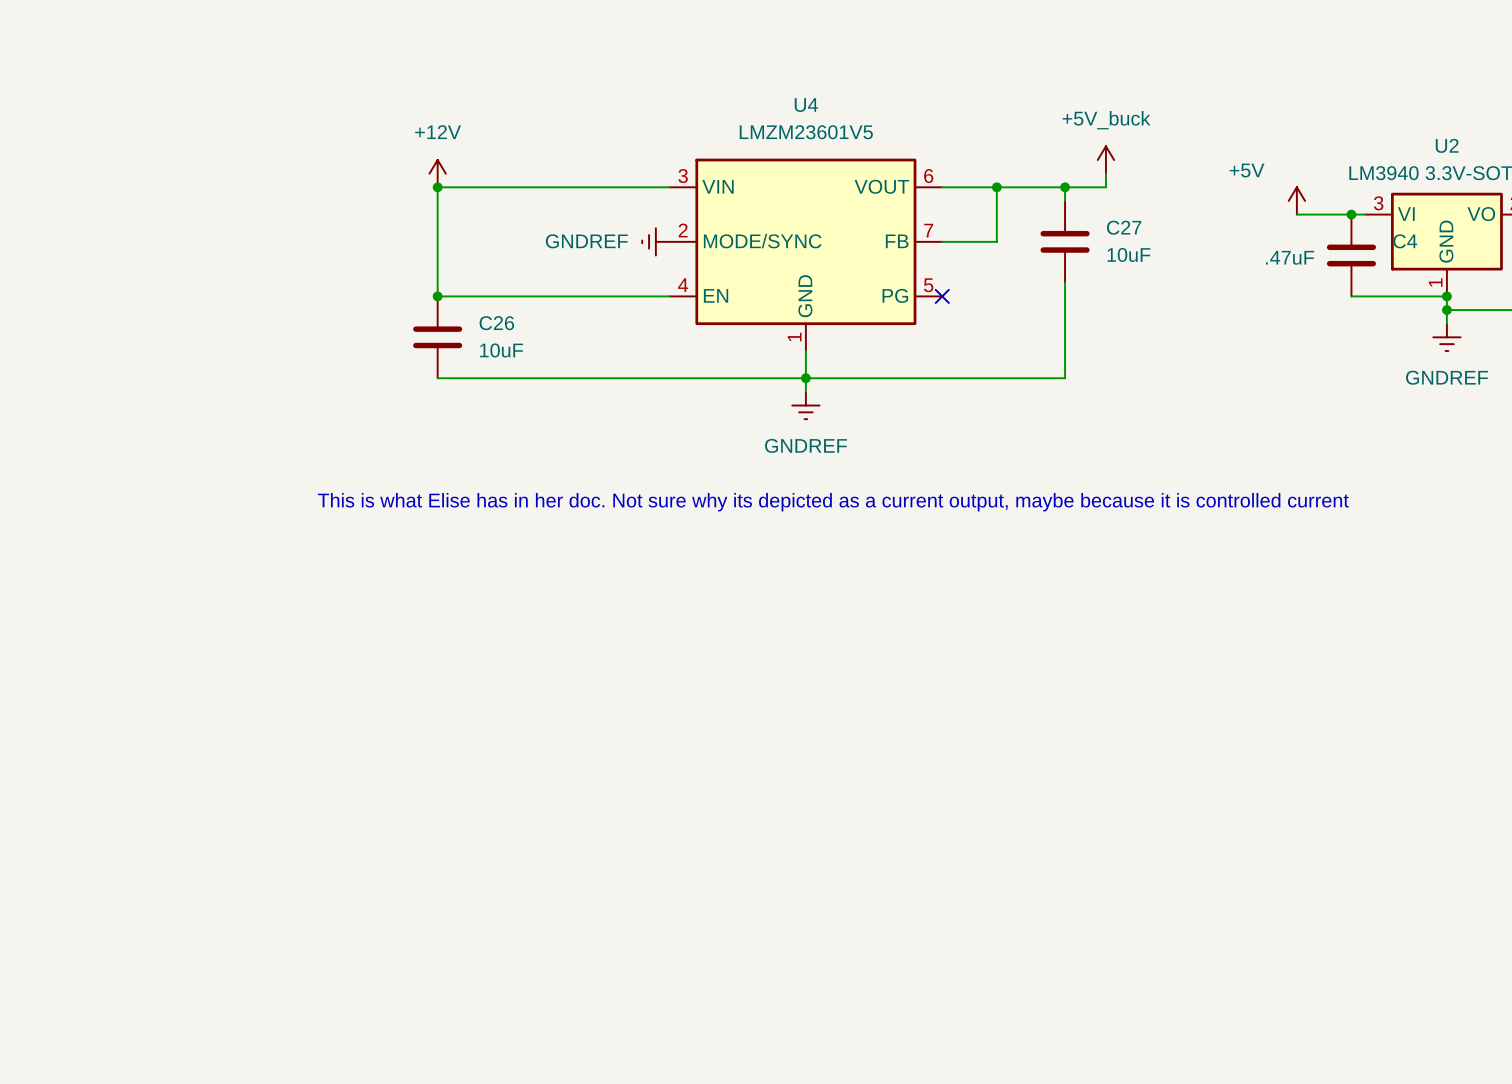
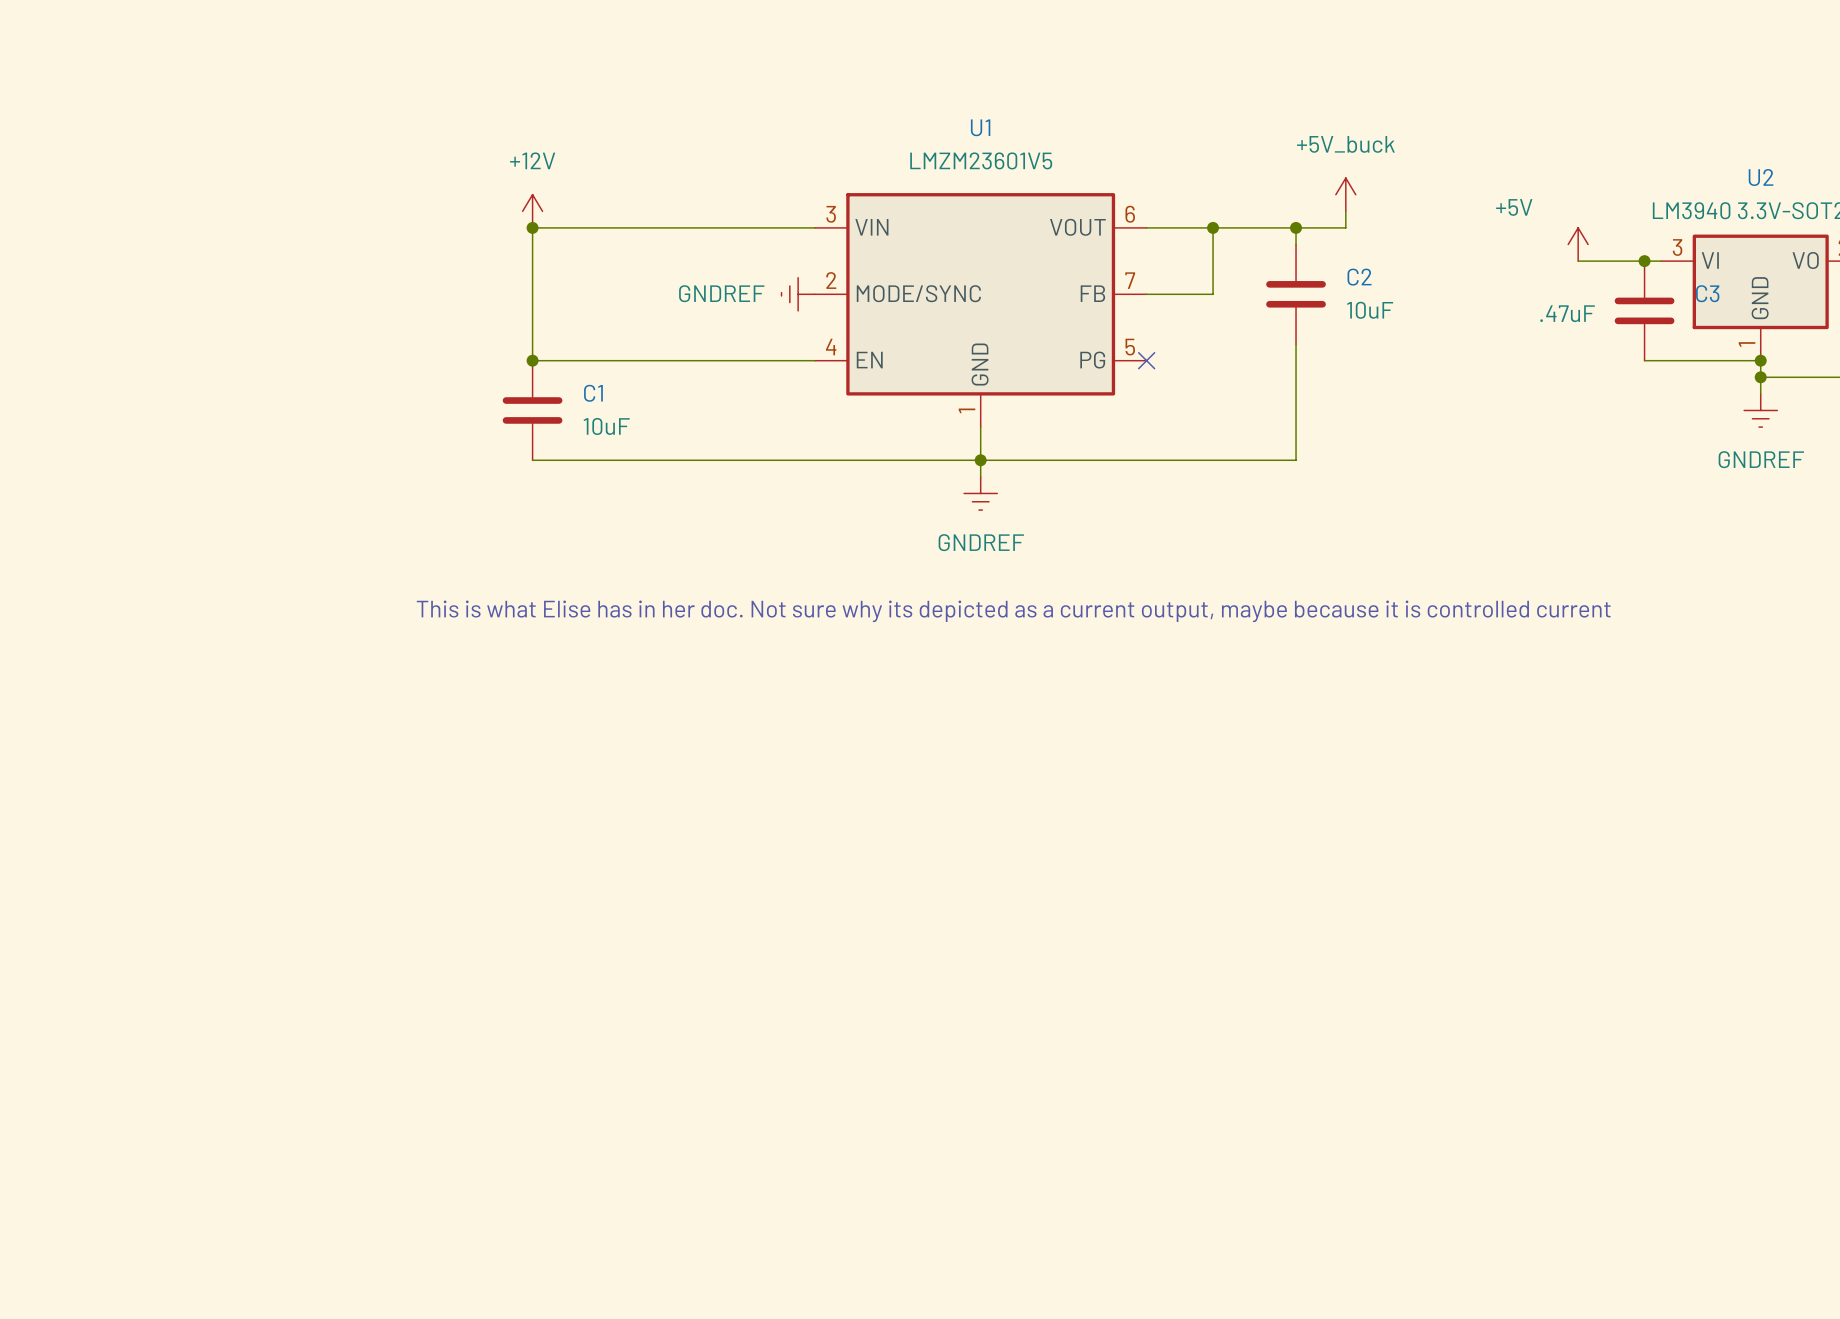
U4 name: U4 (806, 105) -> U1 (980, 127)
C27 name: C27 (1124, 227) -> C2 (1359, 277)
C4 name: C4 (1405, 241) -> C3 (1707, 293)
C26 name: C26 (496, 323) -> C1 (593, 393)

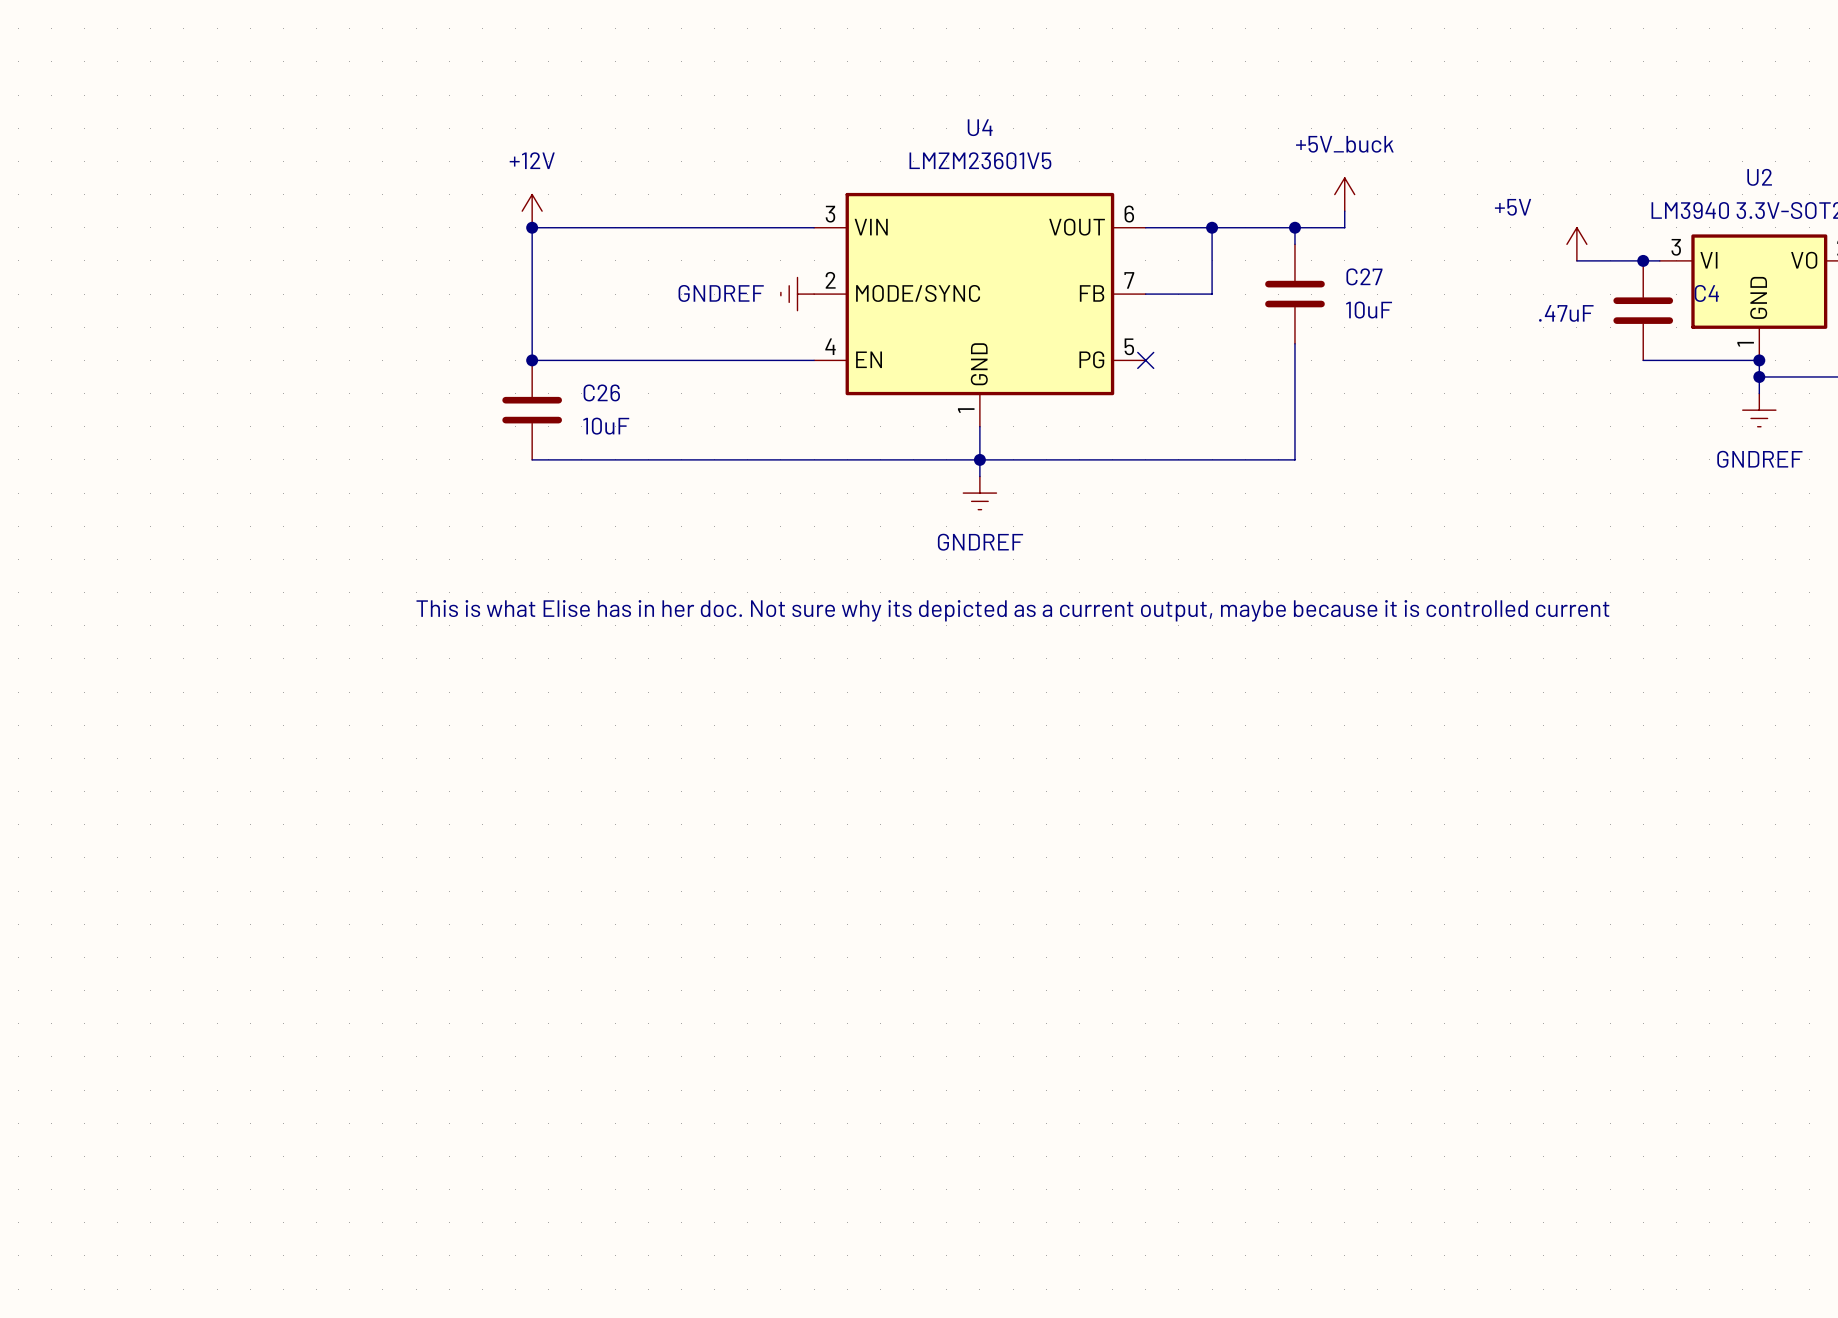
U1 name: U1 (980, 127) -> U4 (980, 127)
C2 name: C2 (1359, 277) -> C27 (1364, 276)
C3 name: C3 (1707, 293) -> C4 (1706, 293)
C1 name: C1 (593, 393) -> C26 (601, 392)

